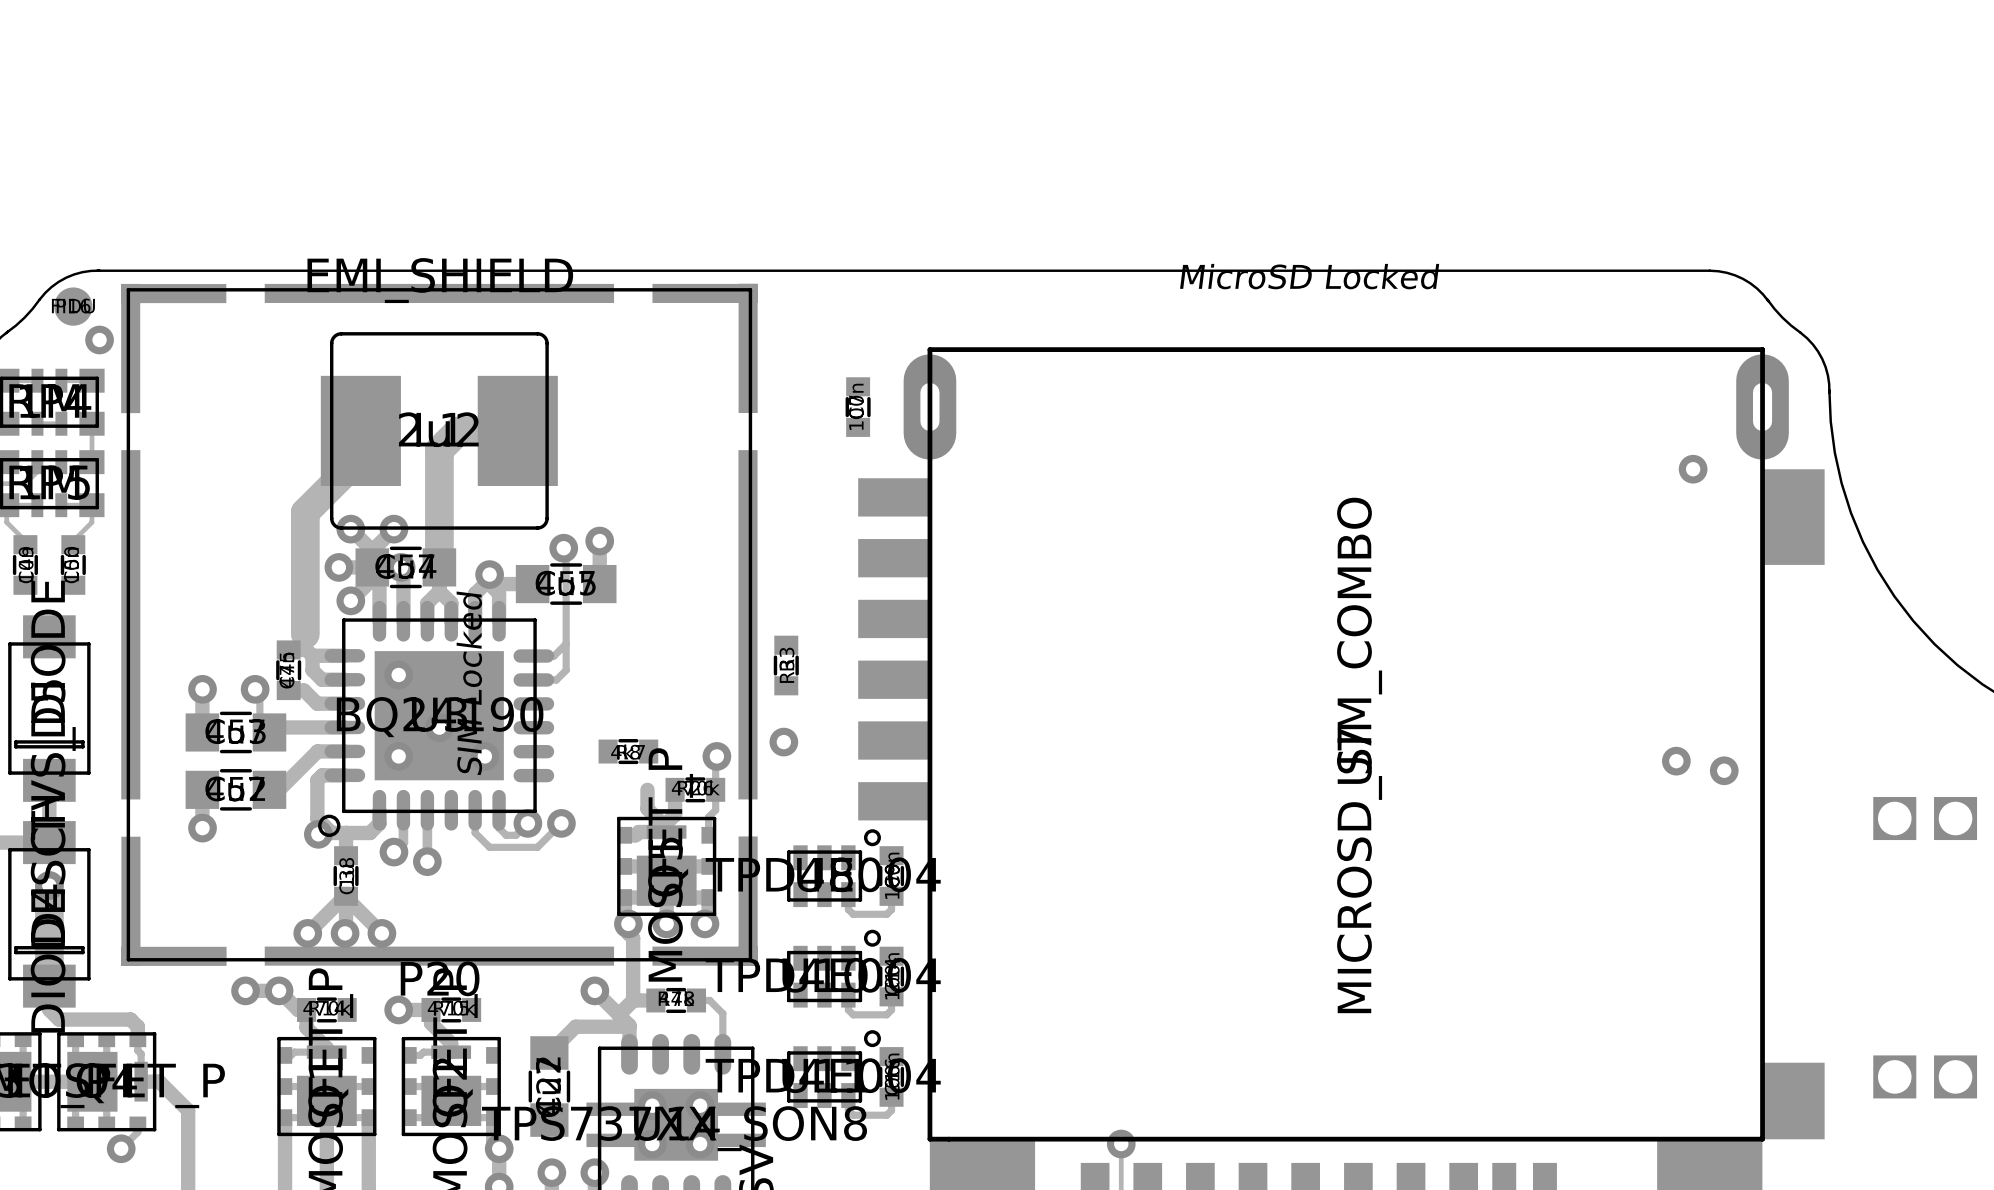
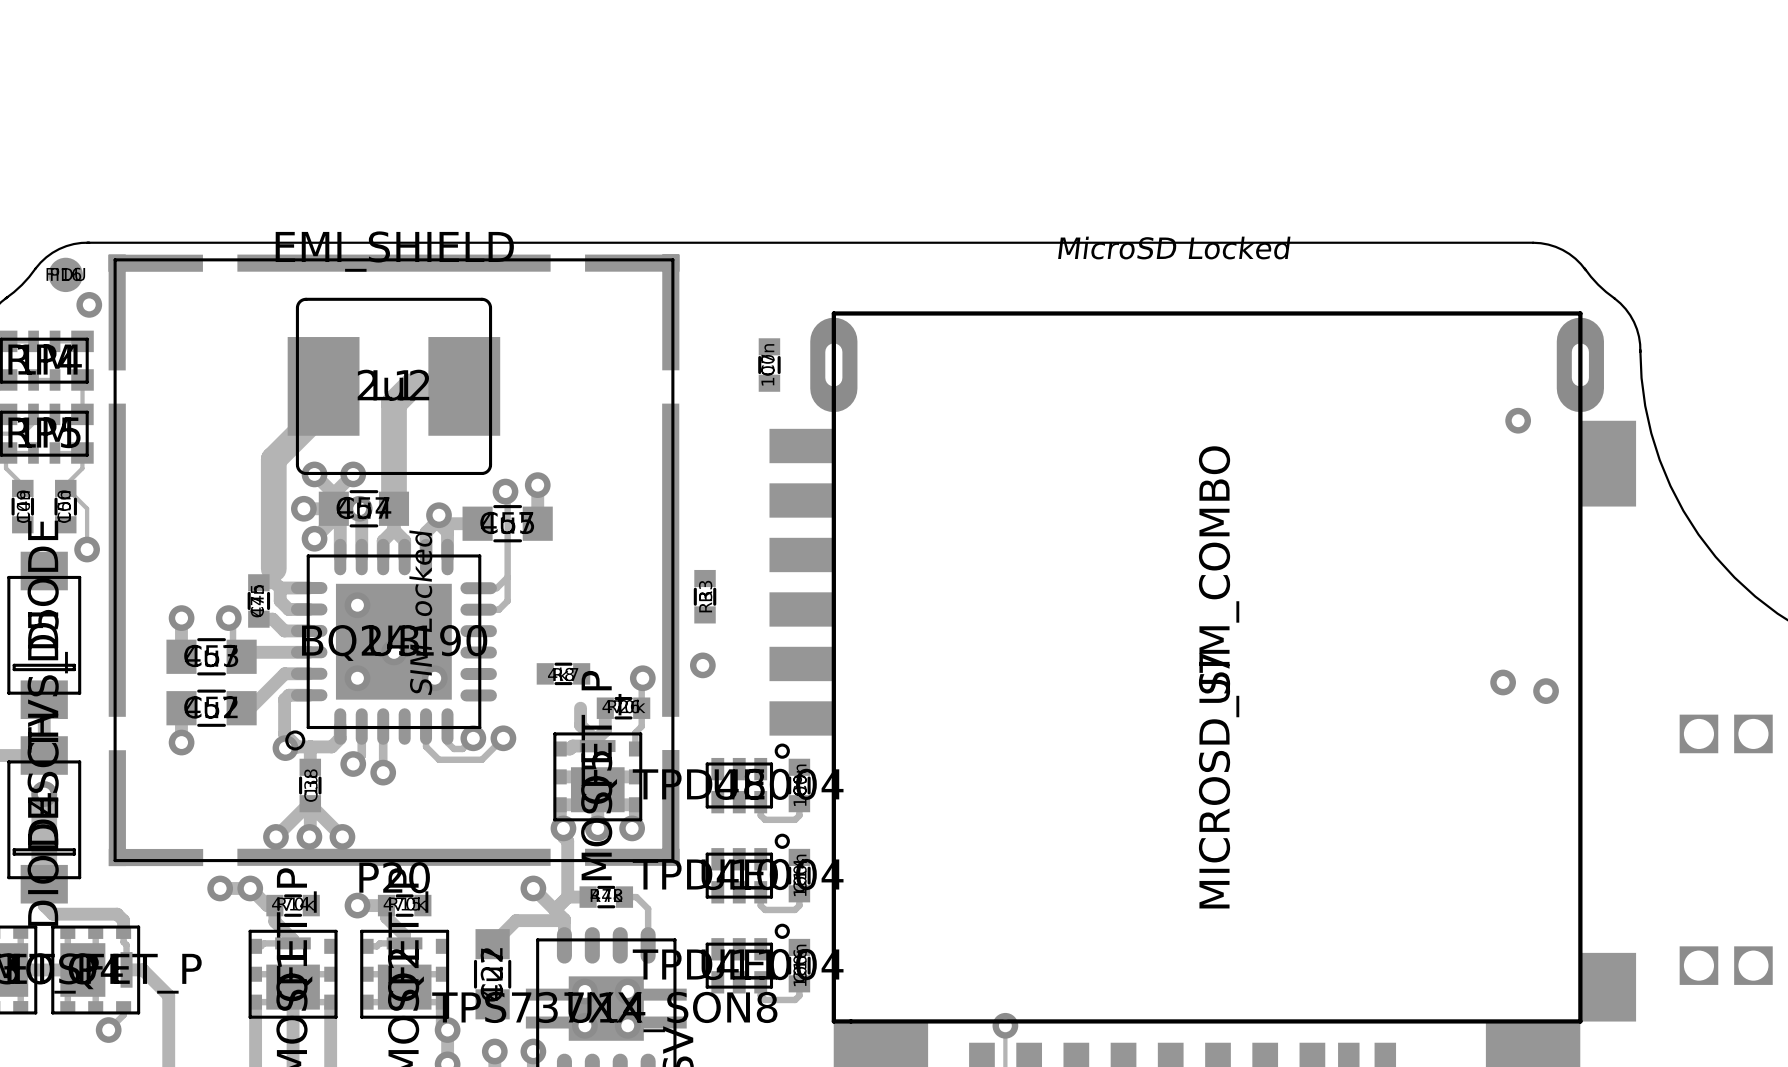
track: none -> (65, 488) (87, 508) (87, 549)
via: none -> (87, 549)

